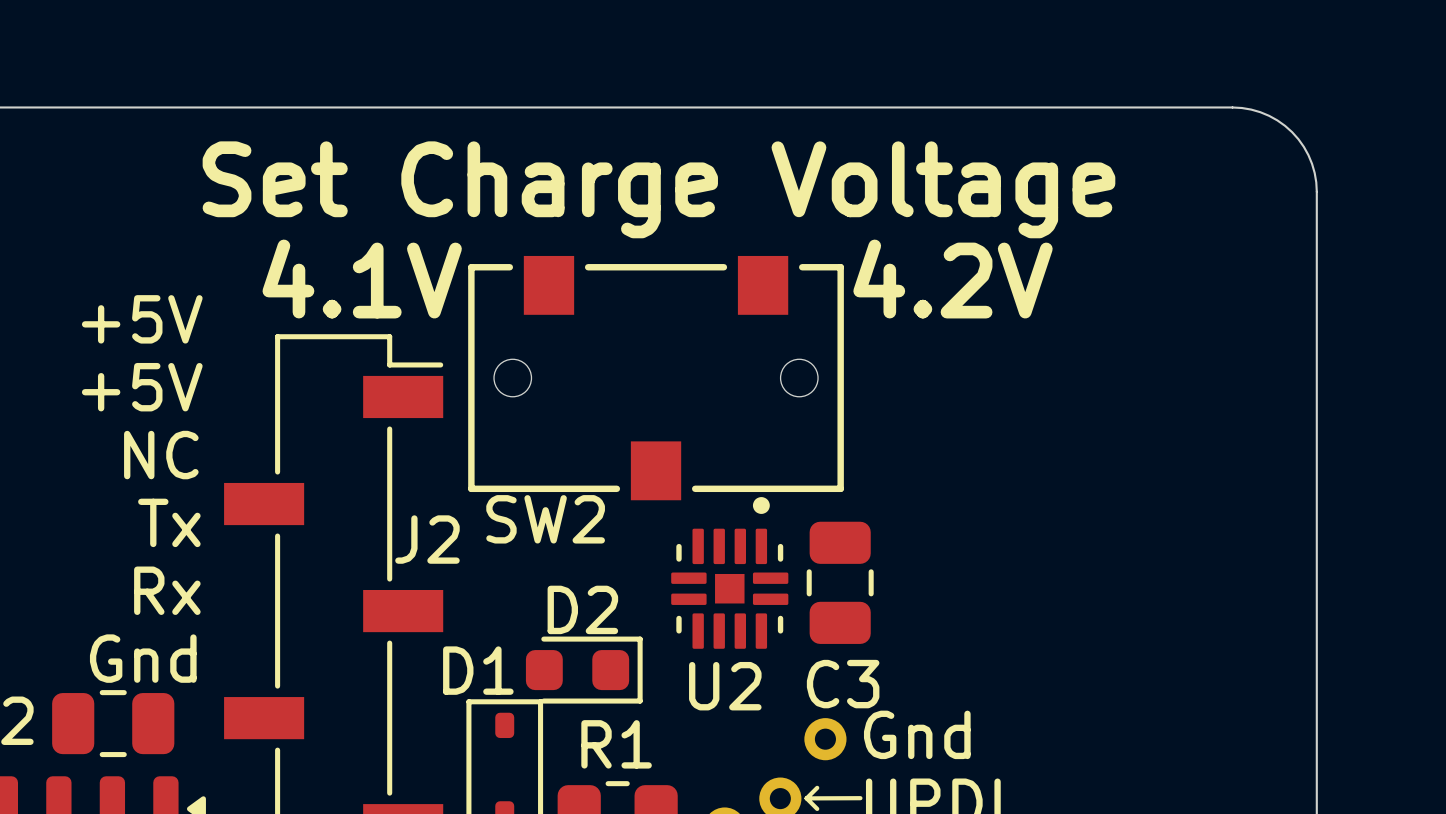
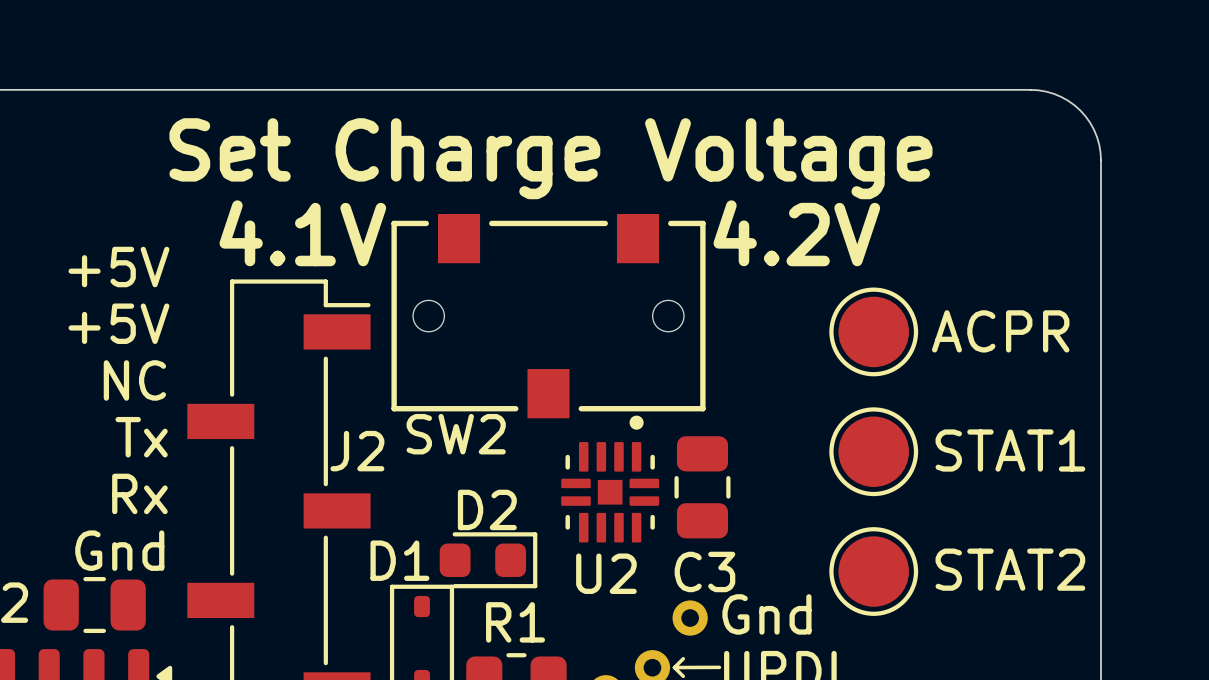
part: none -> (873, 331)
text: none -> ACPR (1000, 331)
text: none -> STAT1 (1010, 450)
part: none -> (873, 451)
text: none -> STAT2 (1010, 569)
part: none -> (873, 571)

